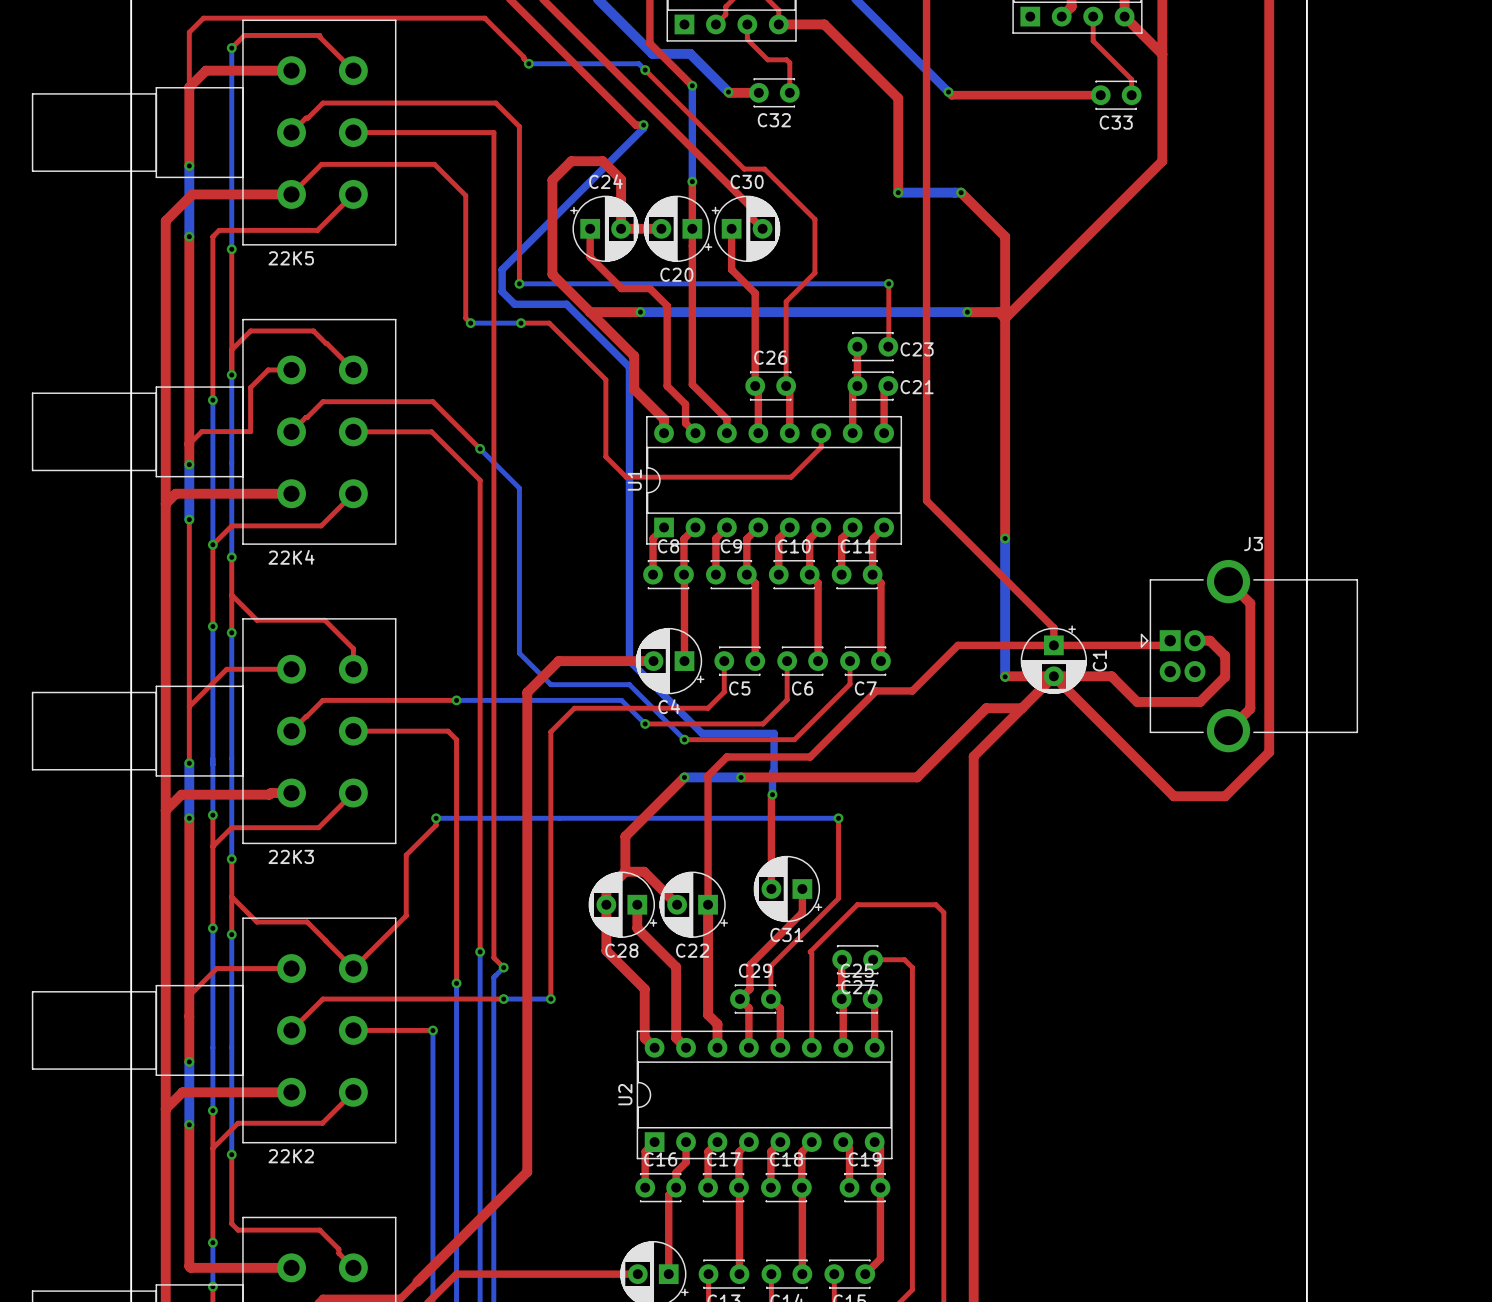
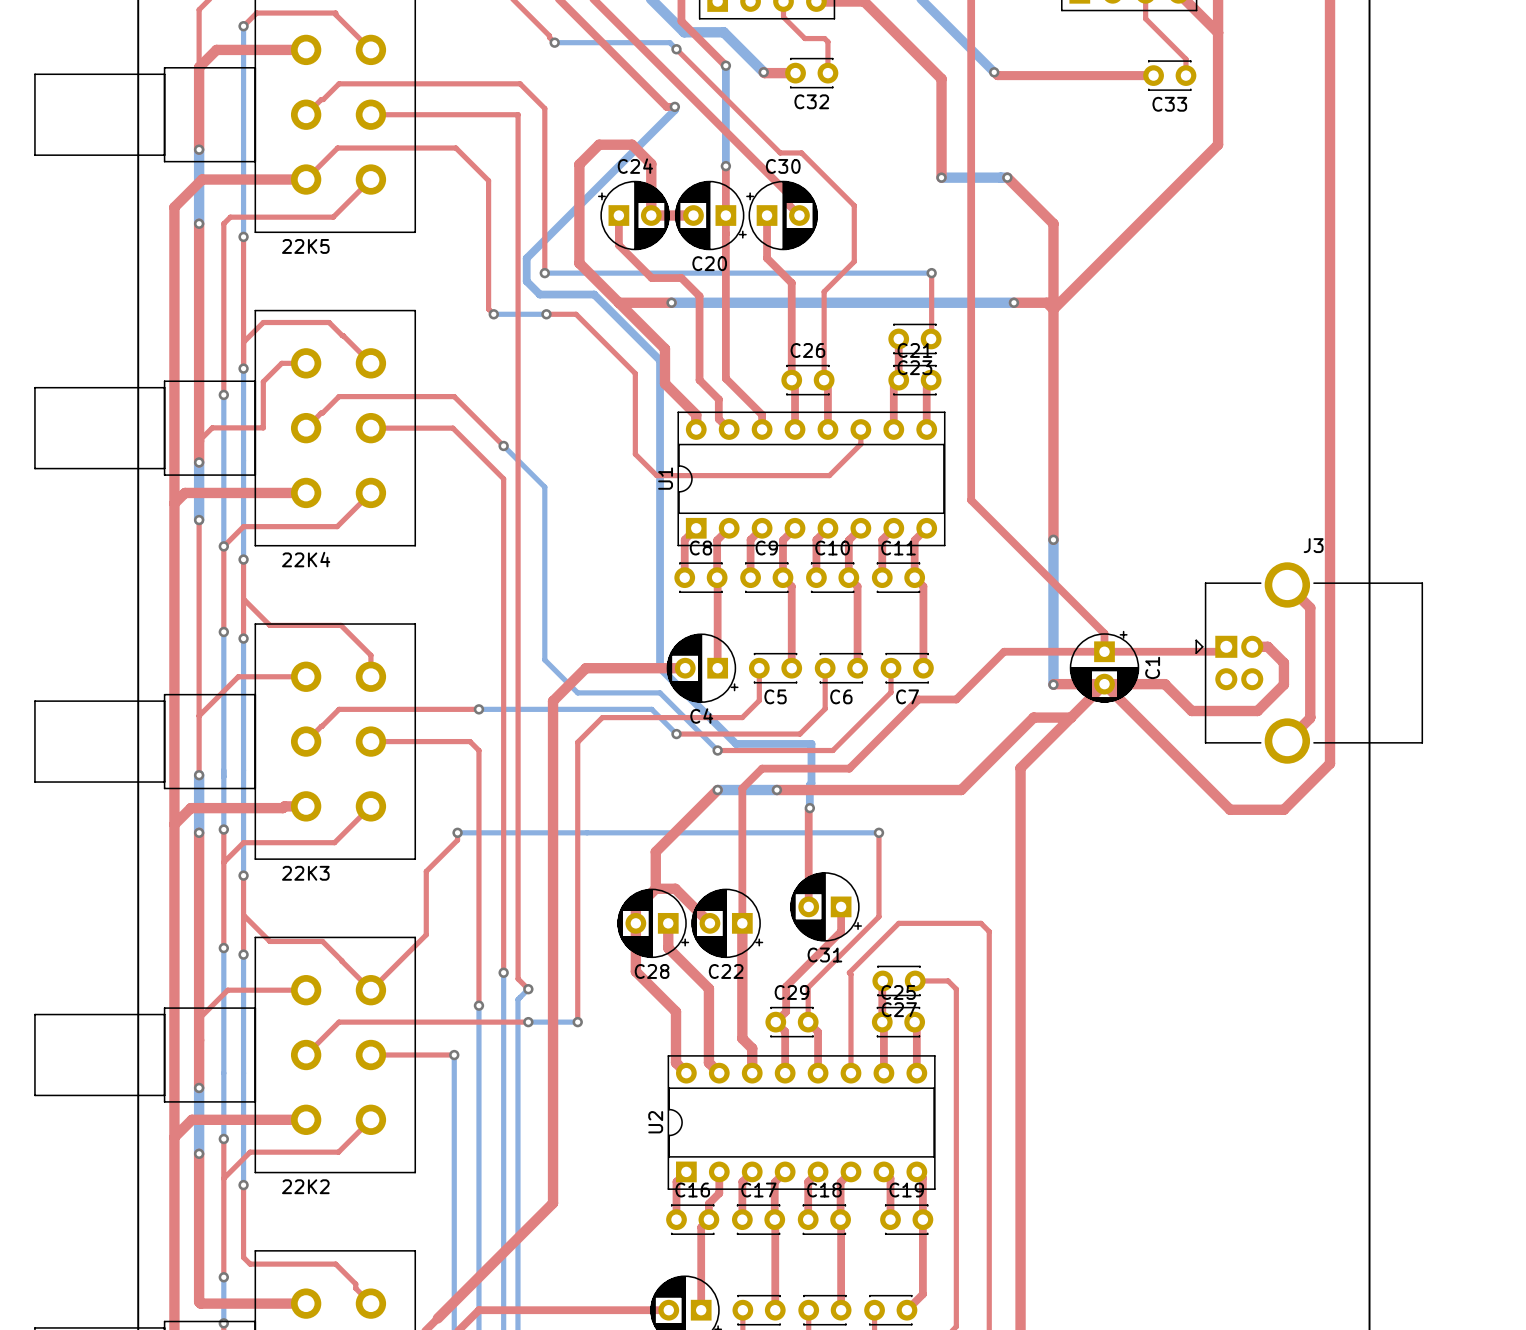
C23 name position: C23 (917, 349) -> C23 (914, 367)
C21 name position: C21 (917, 387) -> C21 (914, 350)

